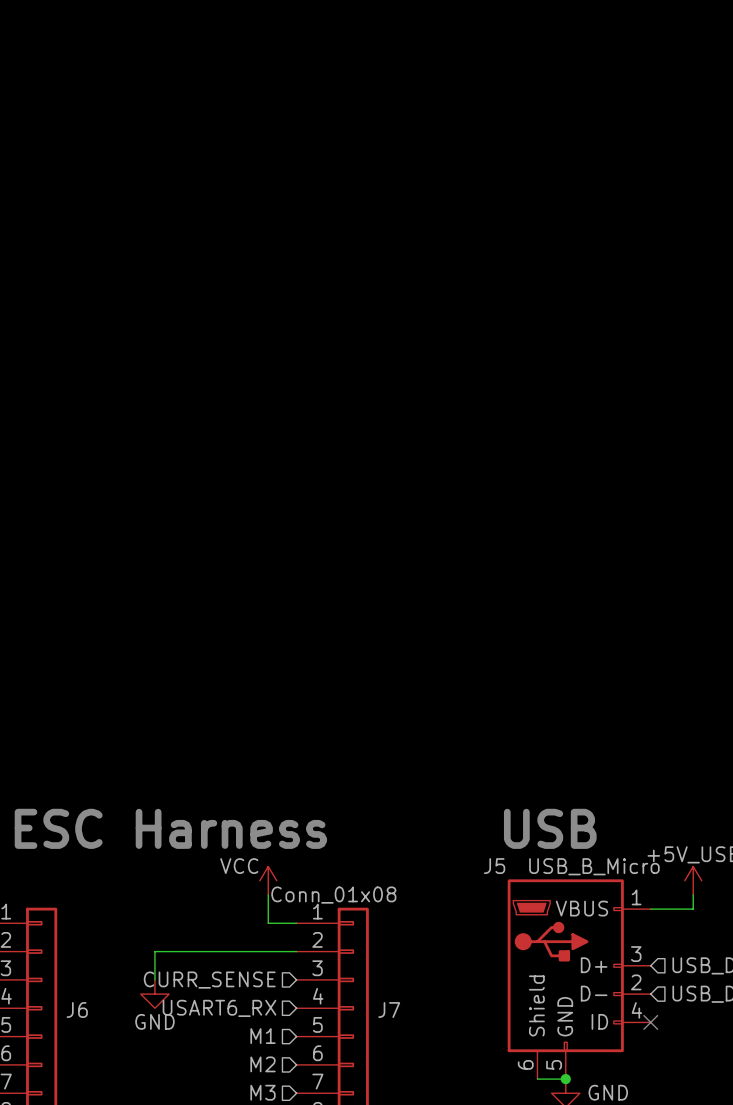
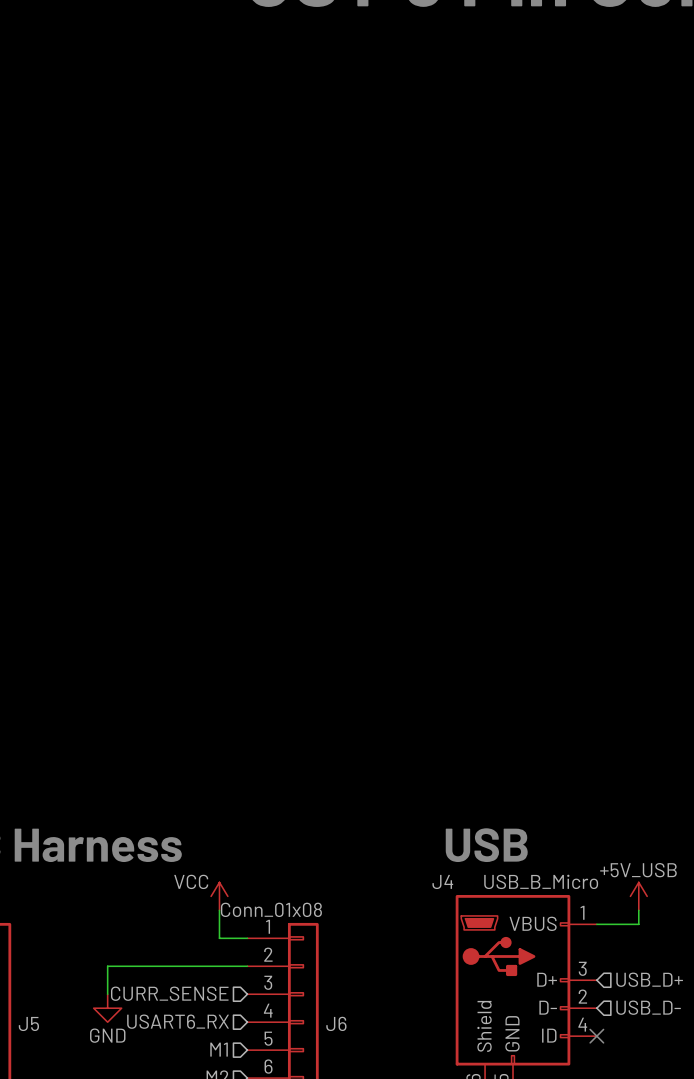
J5 name: J5 (494, 866) -> J4 (442, 881)
J6 name: J6 (77, 1009) -> J5 (28, 1023)
J7 name: J7 (389, 1009) -> J6 (336, 1023)

